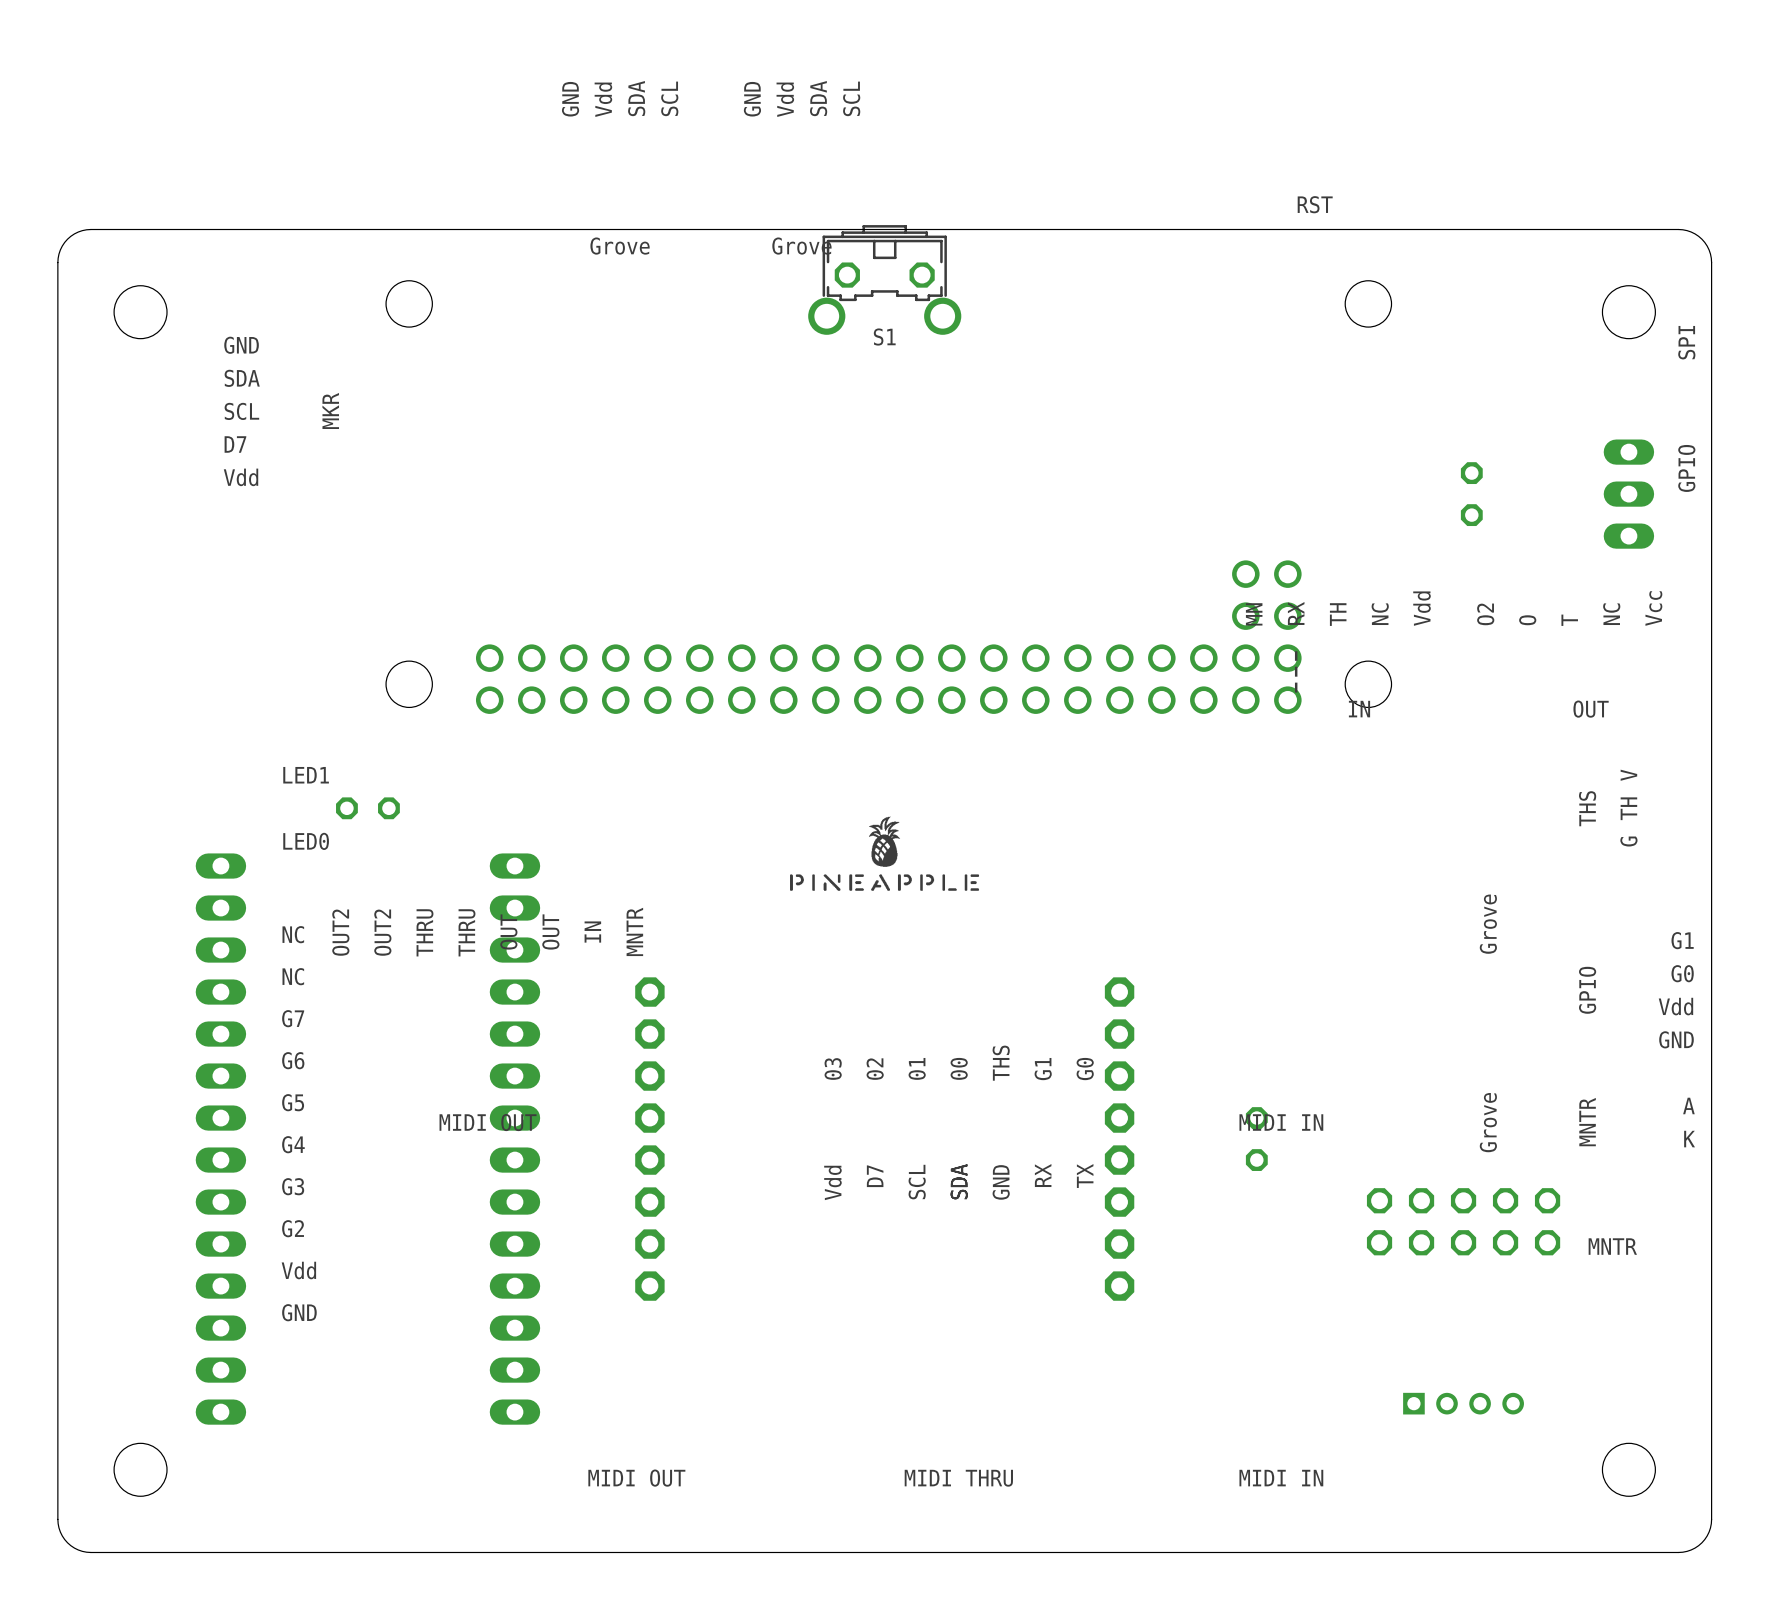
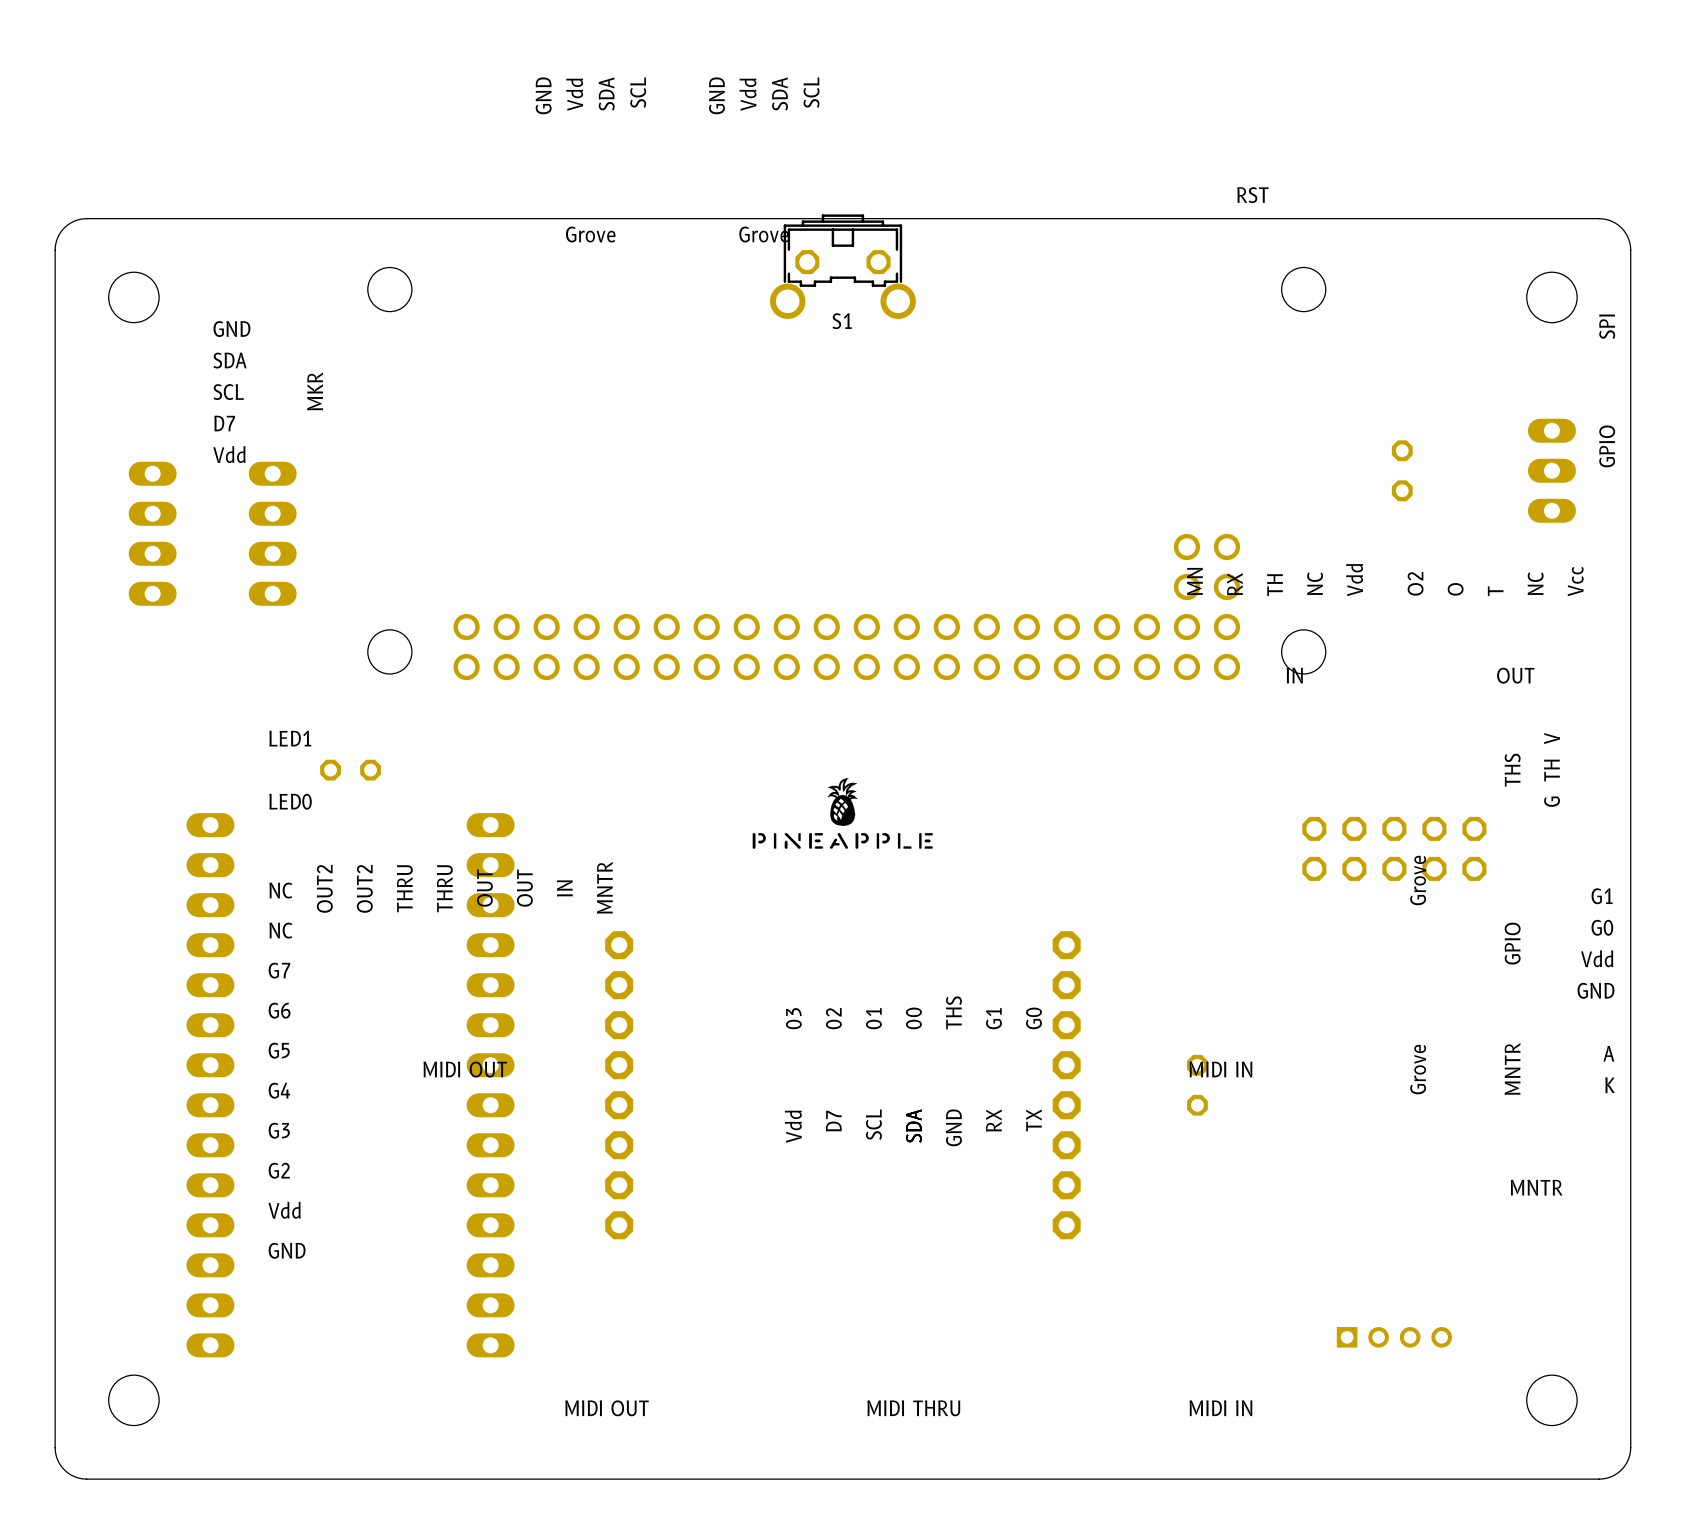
part: none -> (152, 533)
part: none -> (272, 533)
line: (1296, 651) (1296, 692) -> none
part position: (1463, 1221) -> (1394, 848)

